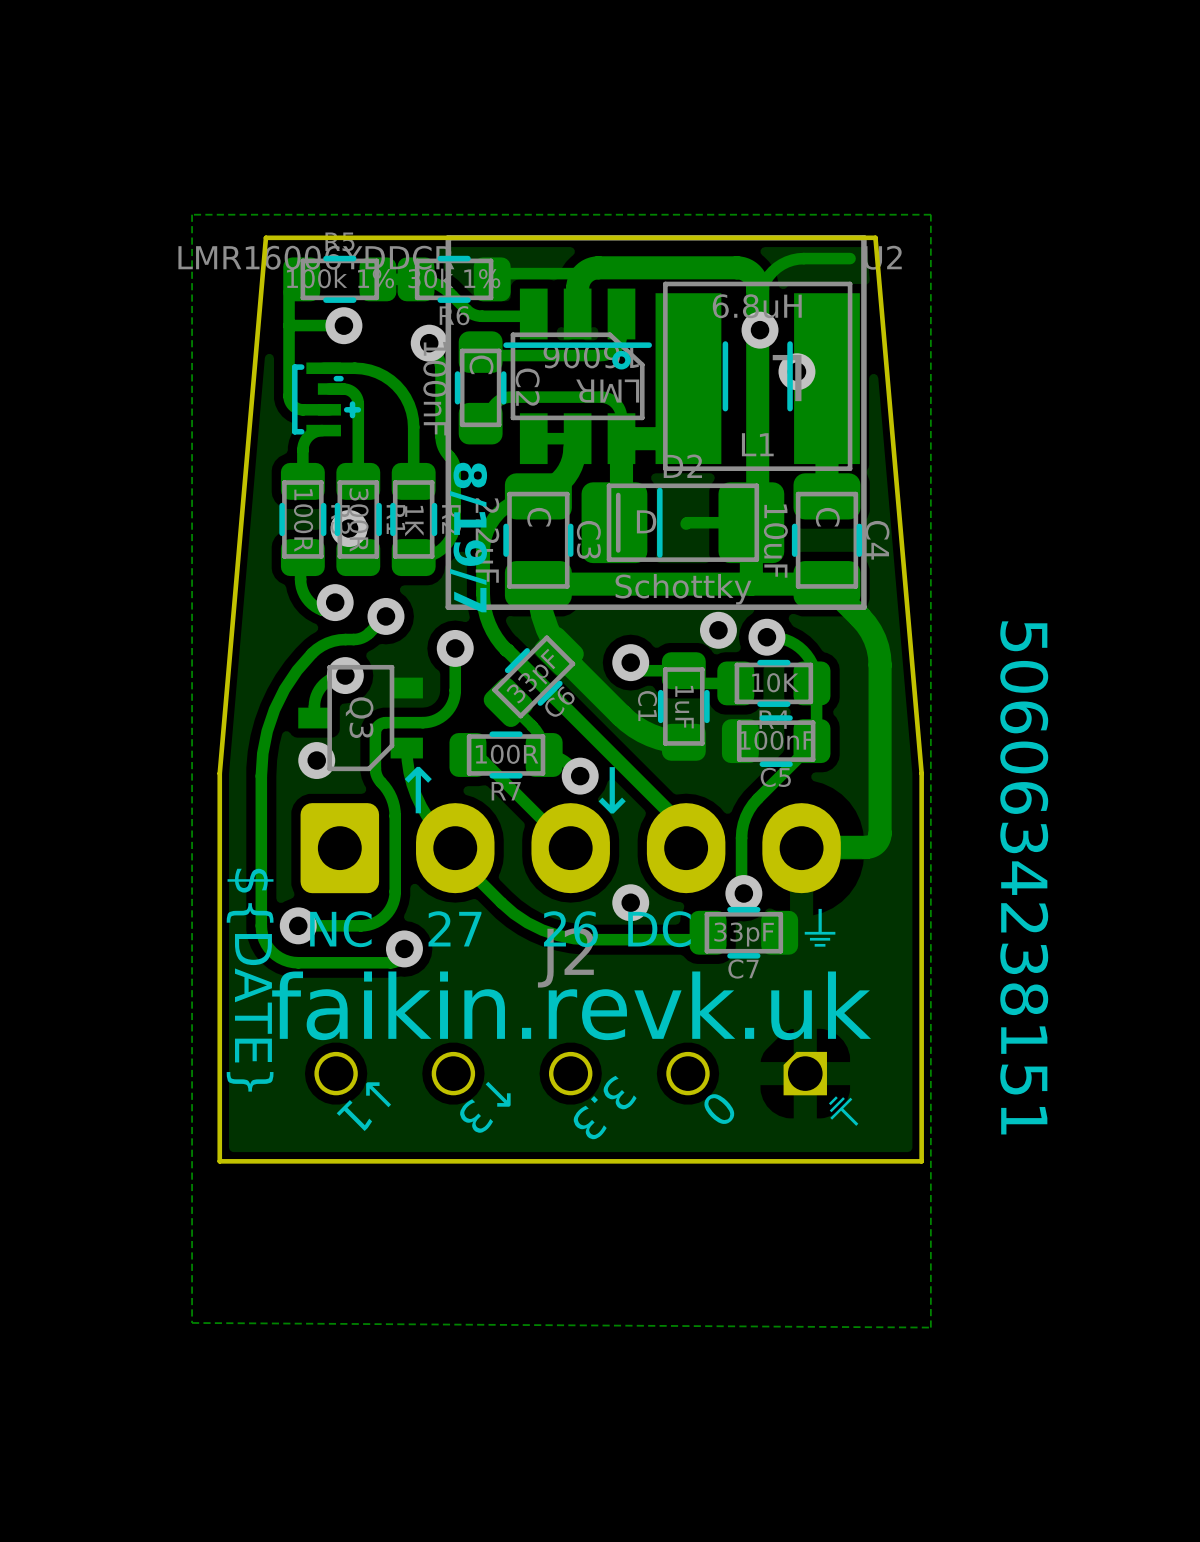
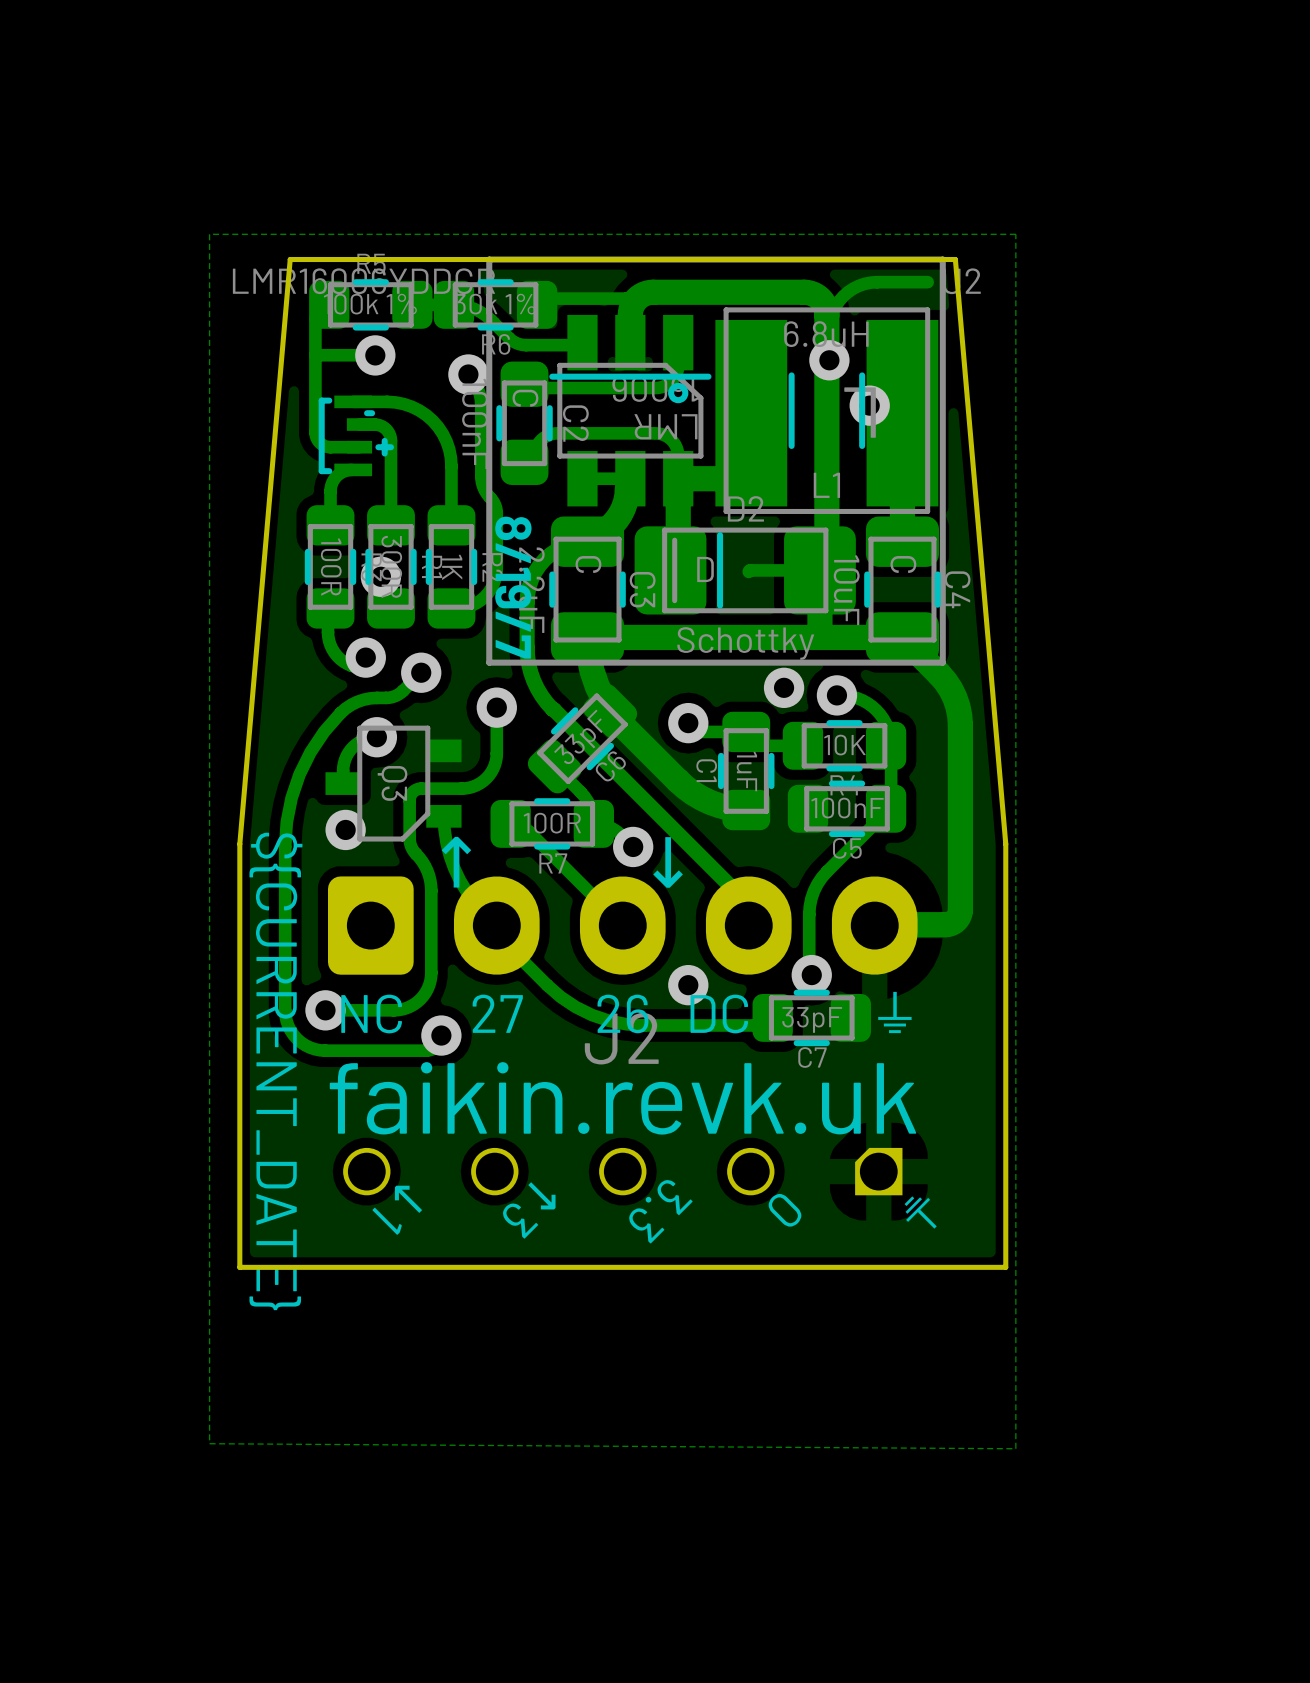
text: 5060634238151 (1024, 877) -> none
text: ${DATE} (250, 980) -> ${CURRENT_DATE} (275, 1071)

